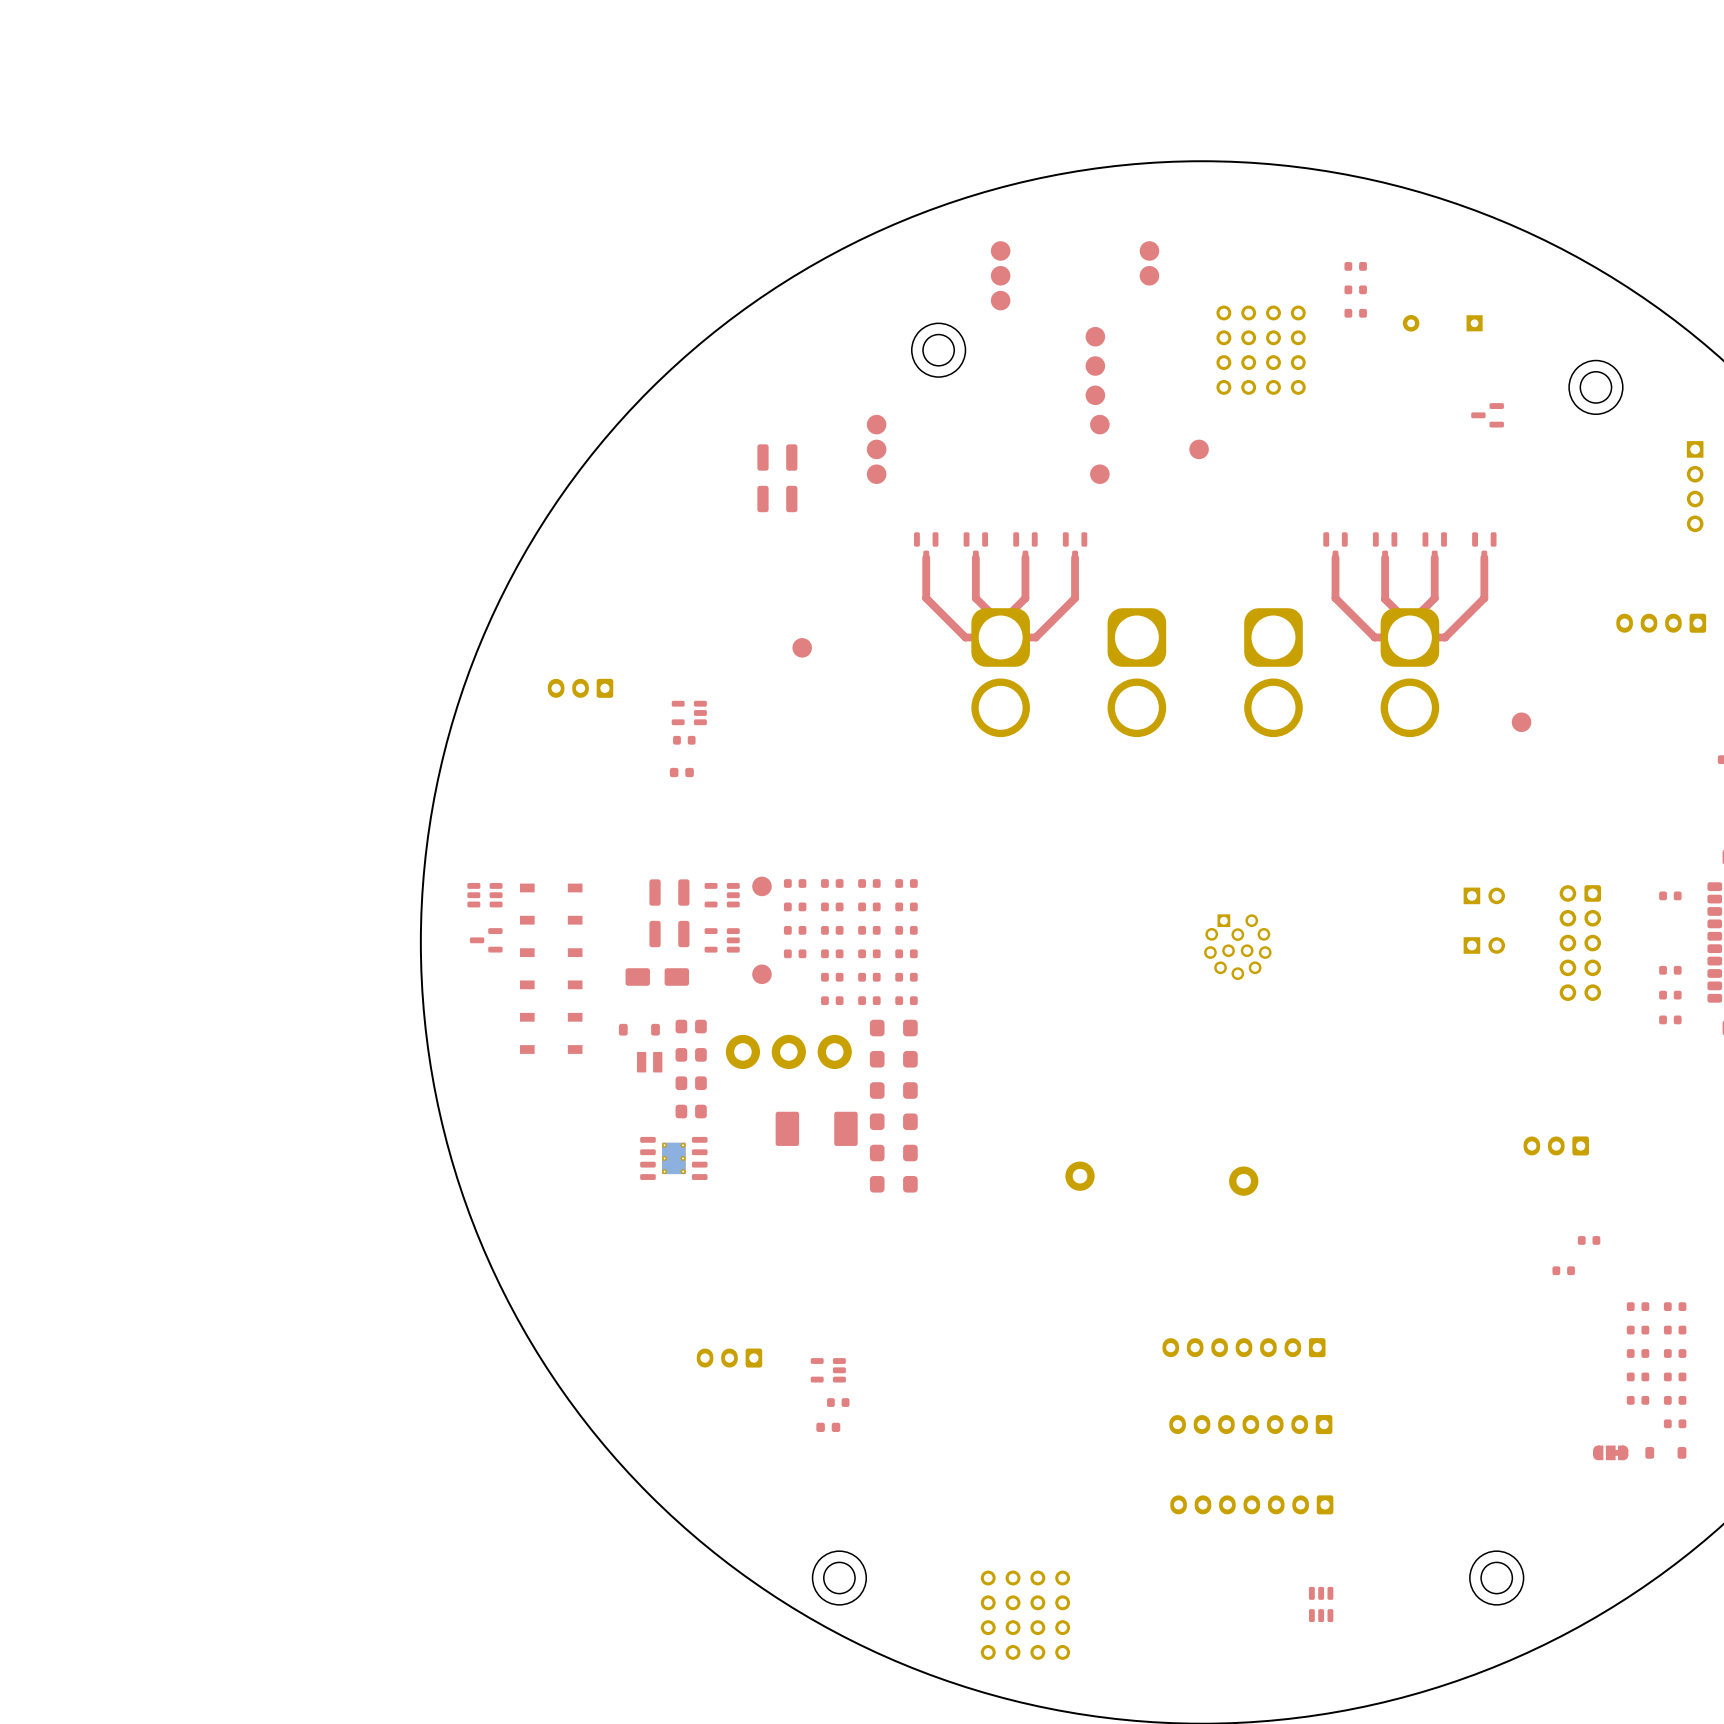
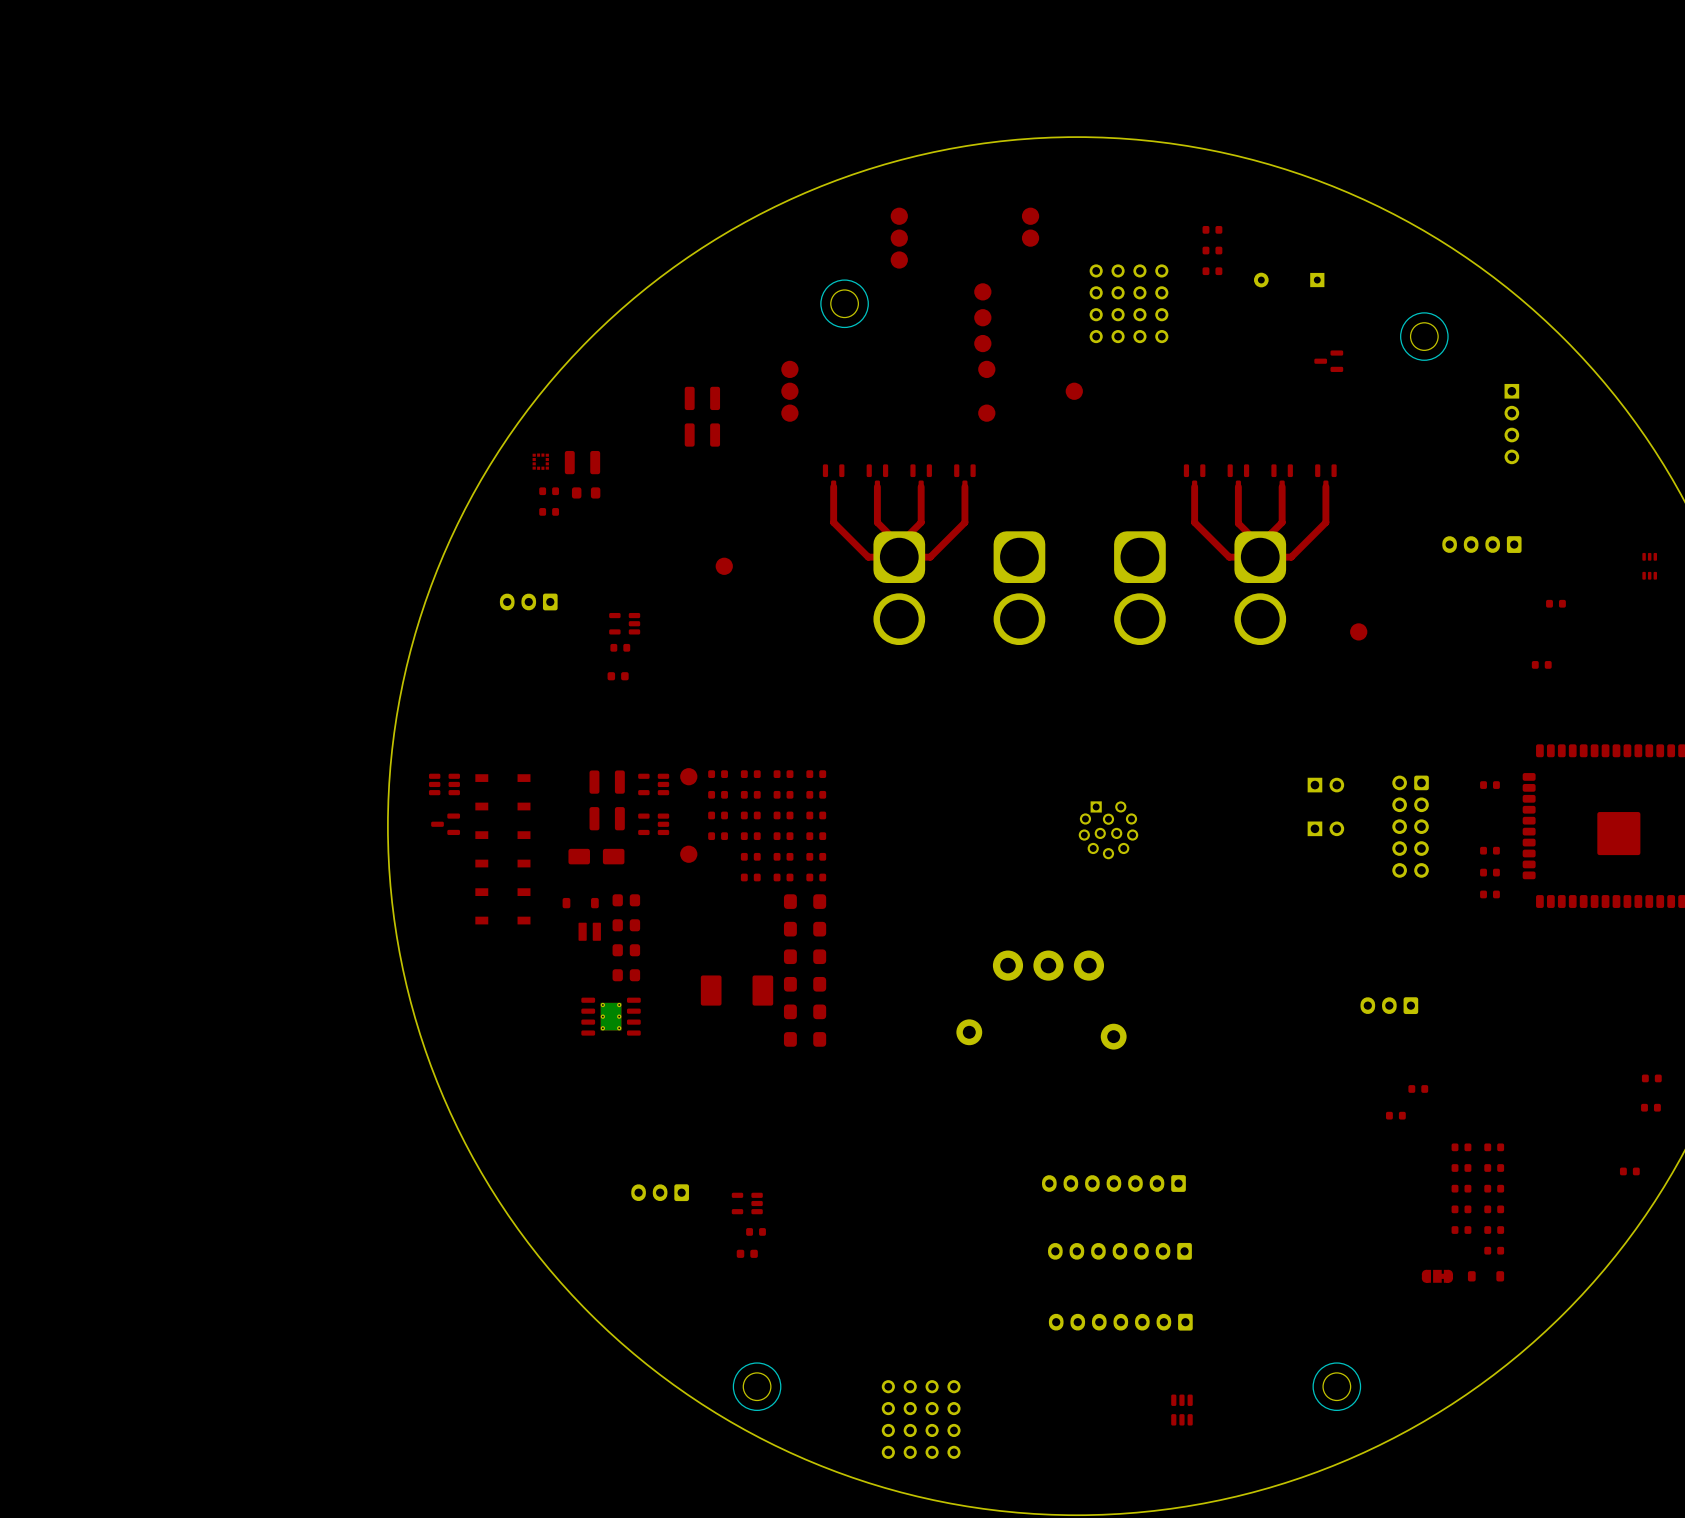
part: none -> (540, 461)
part: none -> (582, 462)
part: none -> (549, 491)
part: none -> (586, 492)
part: none -> (549, 511)
part: (788, 1051) -> none
part: none -> (1048, 965)

